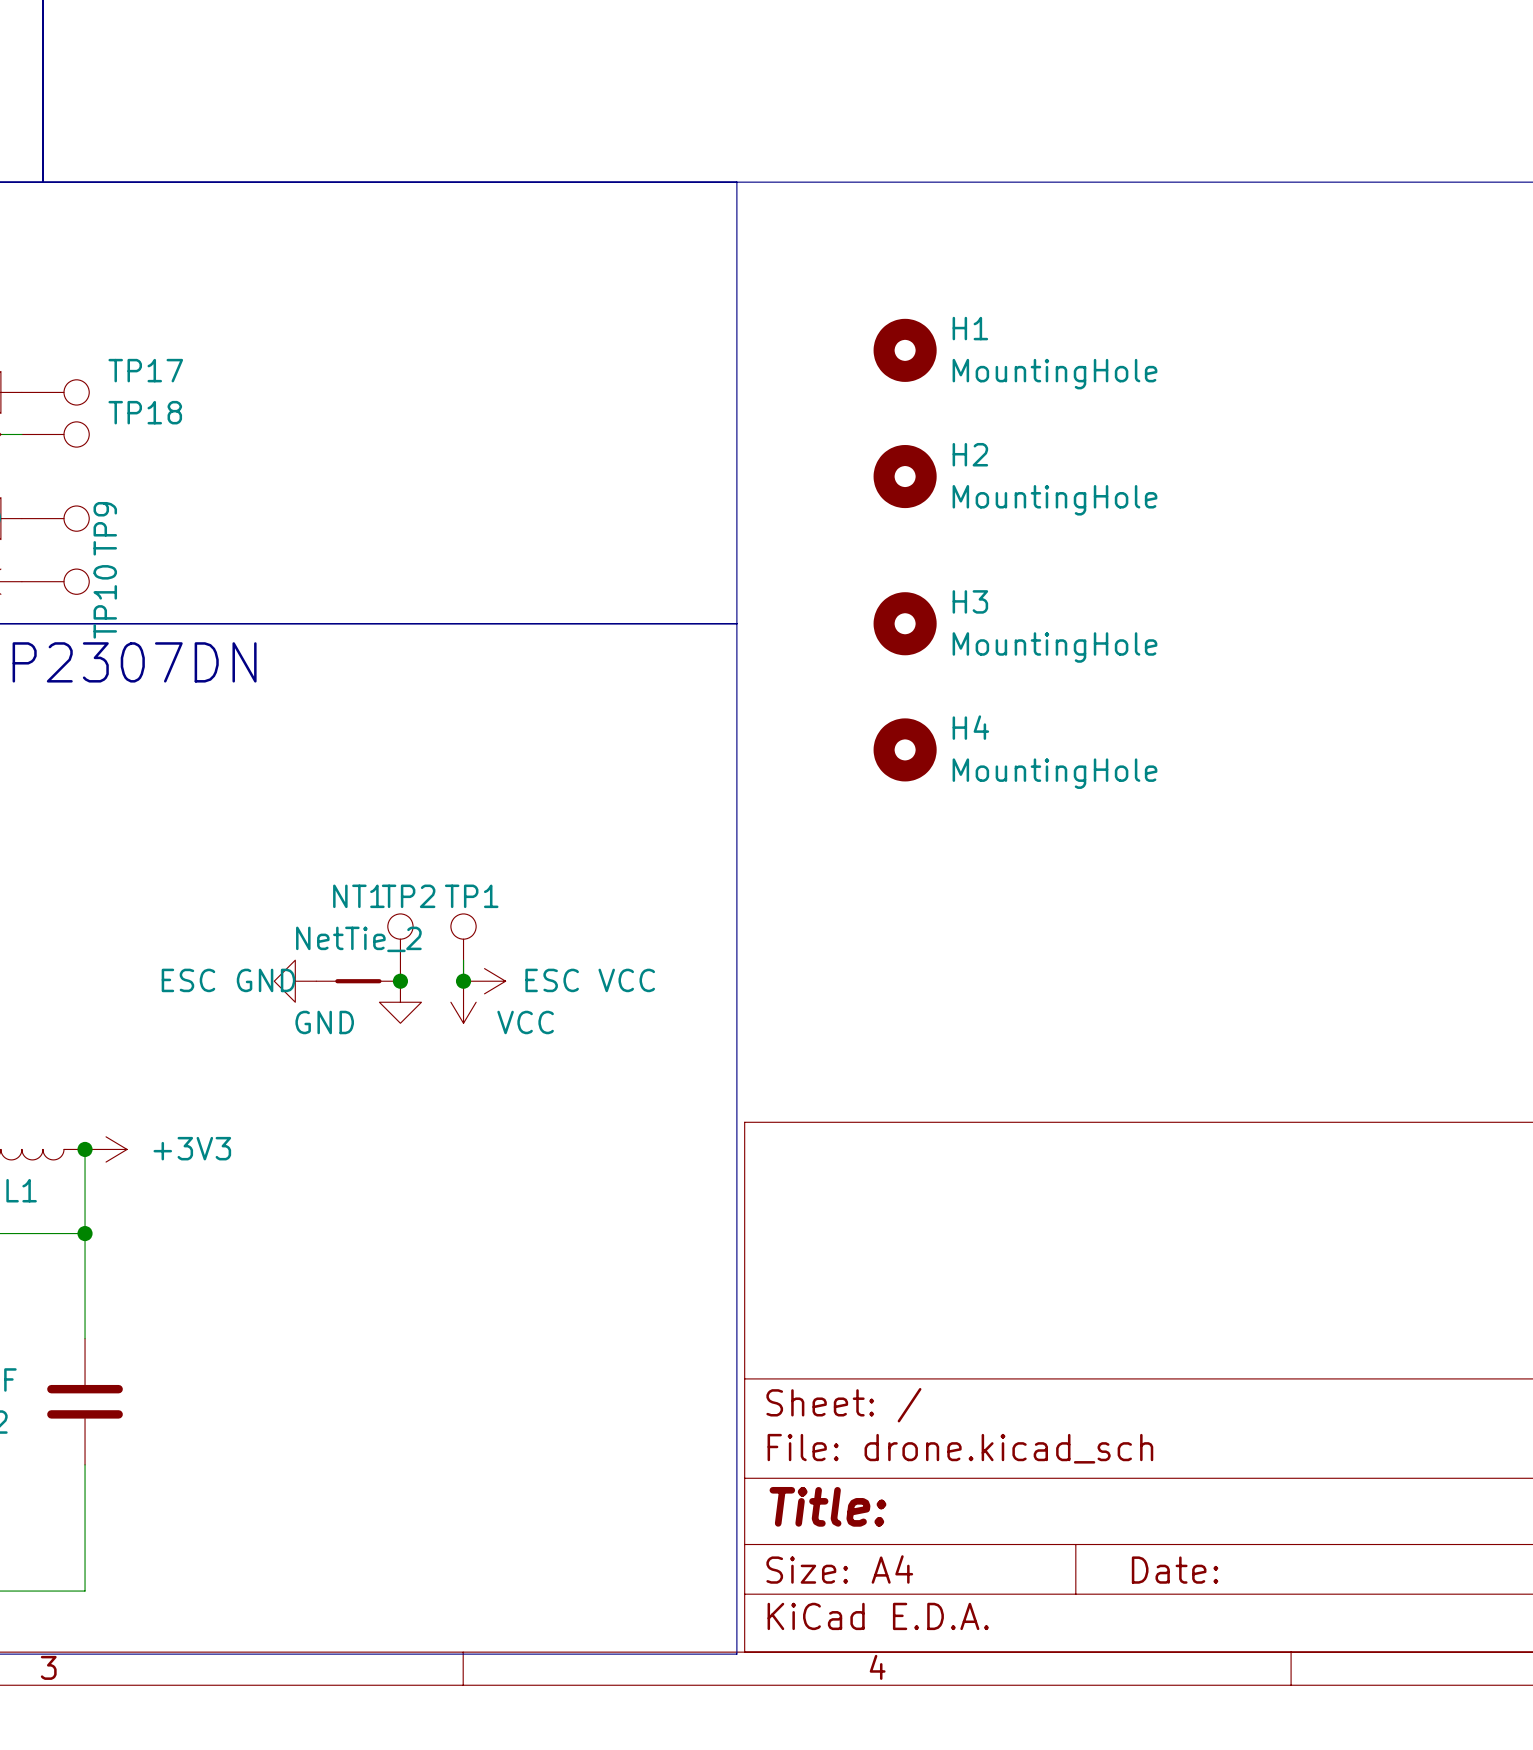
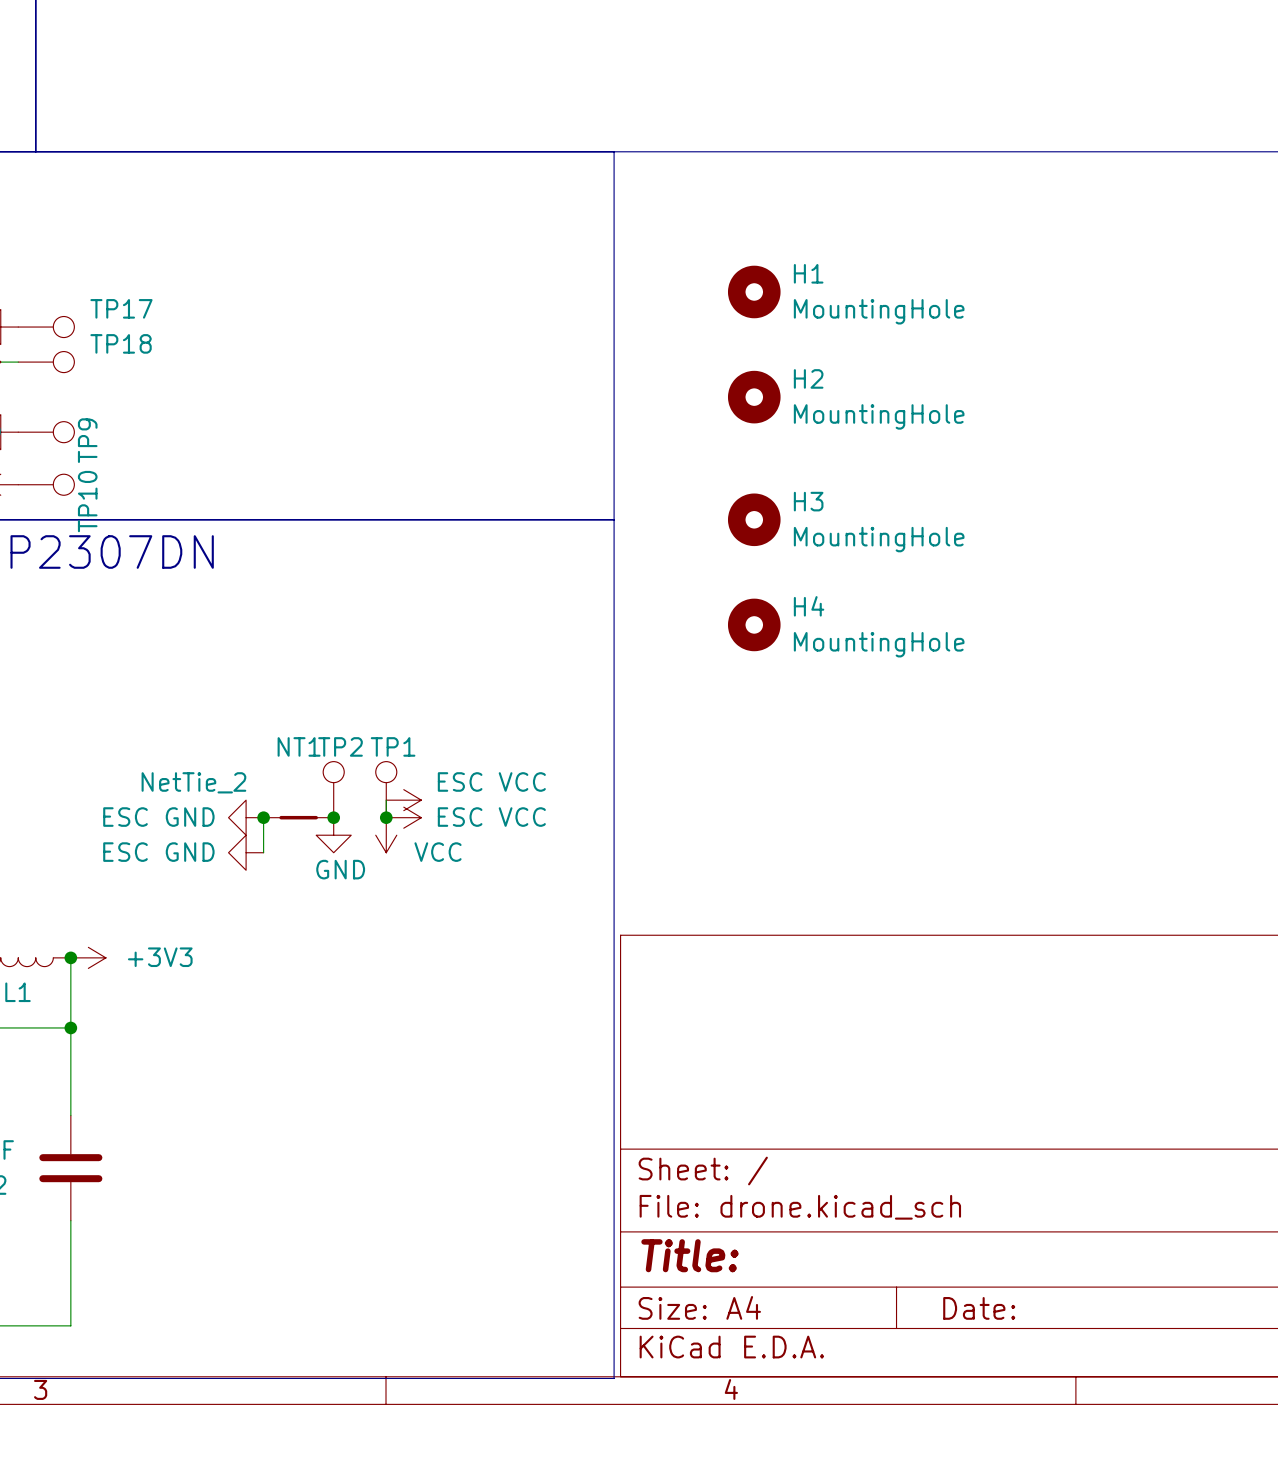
NT1 value position: NetTie_2 (358, 939) -> NetTie_2 (193, 782)
power symbol: none -> ESC VCC (403, 800)
power symbol text position: ESC GND (228, 980) -> ESC GND (158, 817)
wire: none -> (263, 817) (263, 852)
junction: none -> (263, 817)
power symbol text position: GND (324, 1022) -> GND (340, 869)
power symbol: none -> ESC GND (246, 852)

